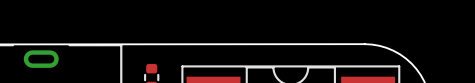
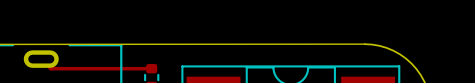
top track: none -> (41, 59) (50, 68) (151, 68)

